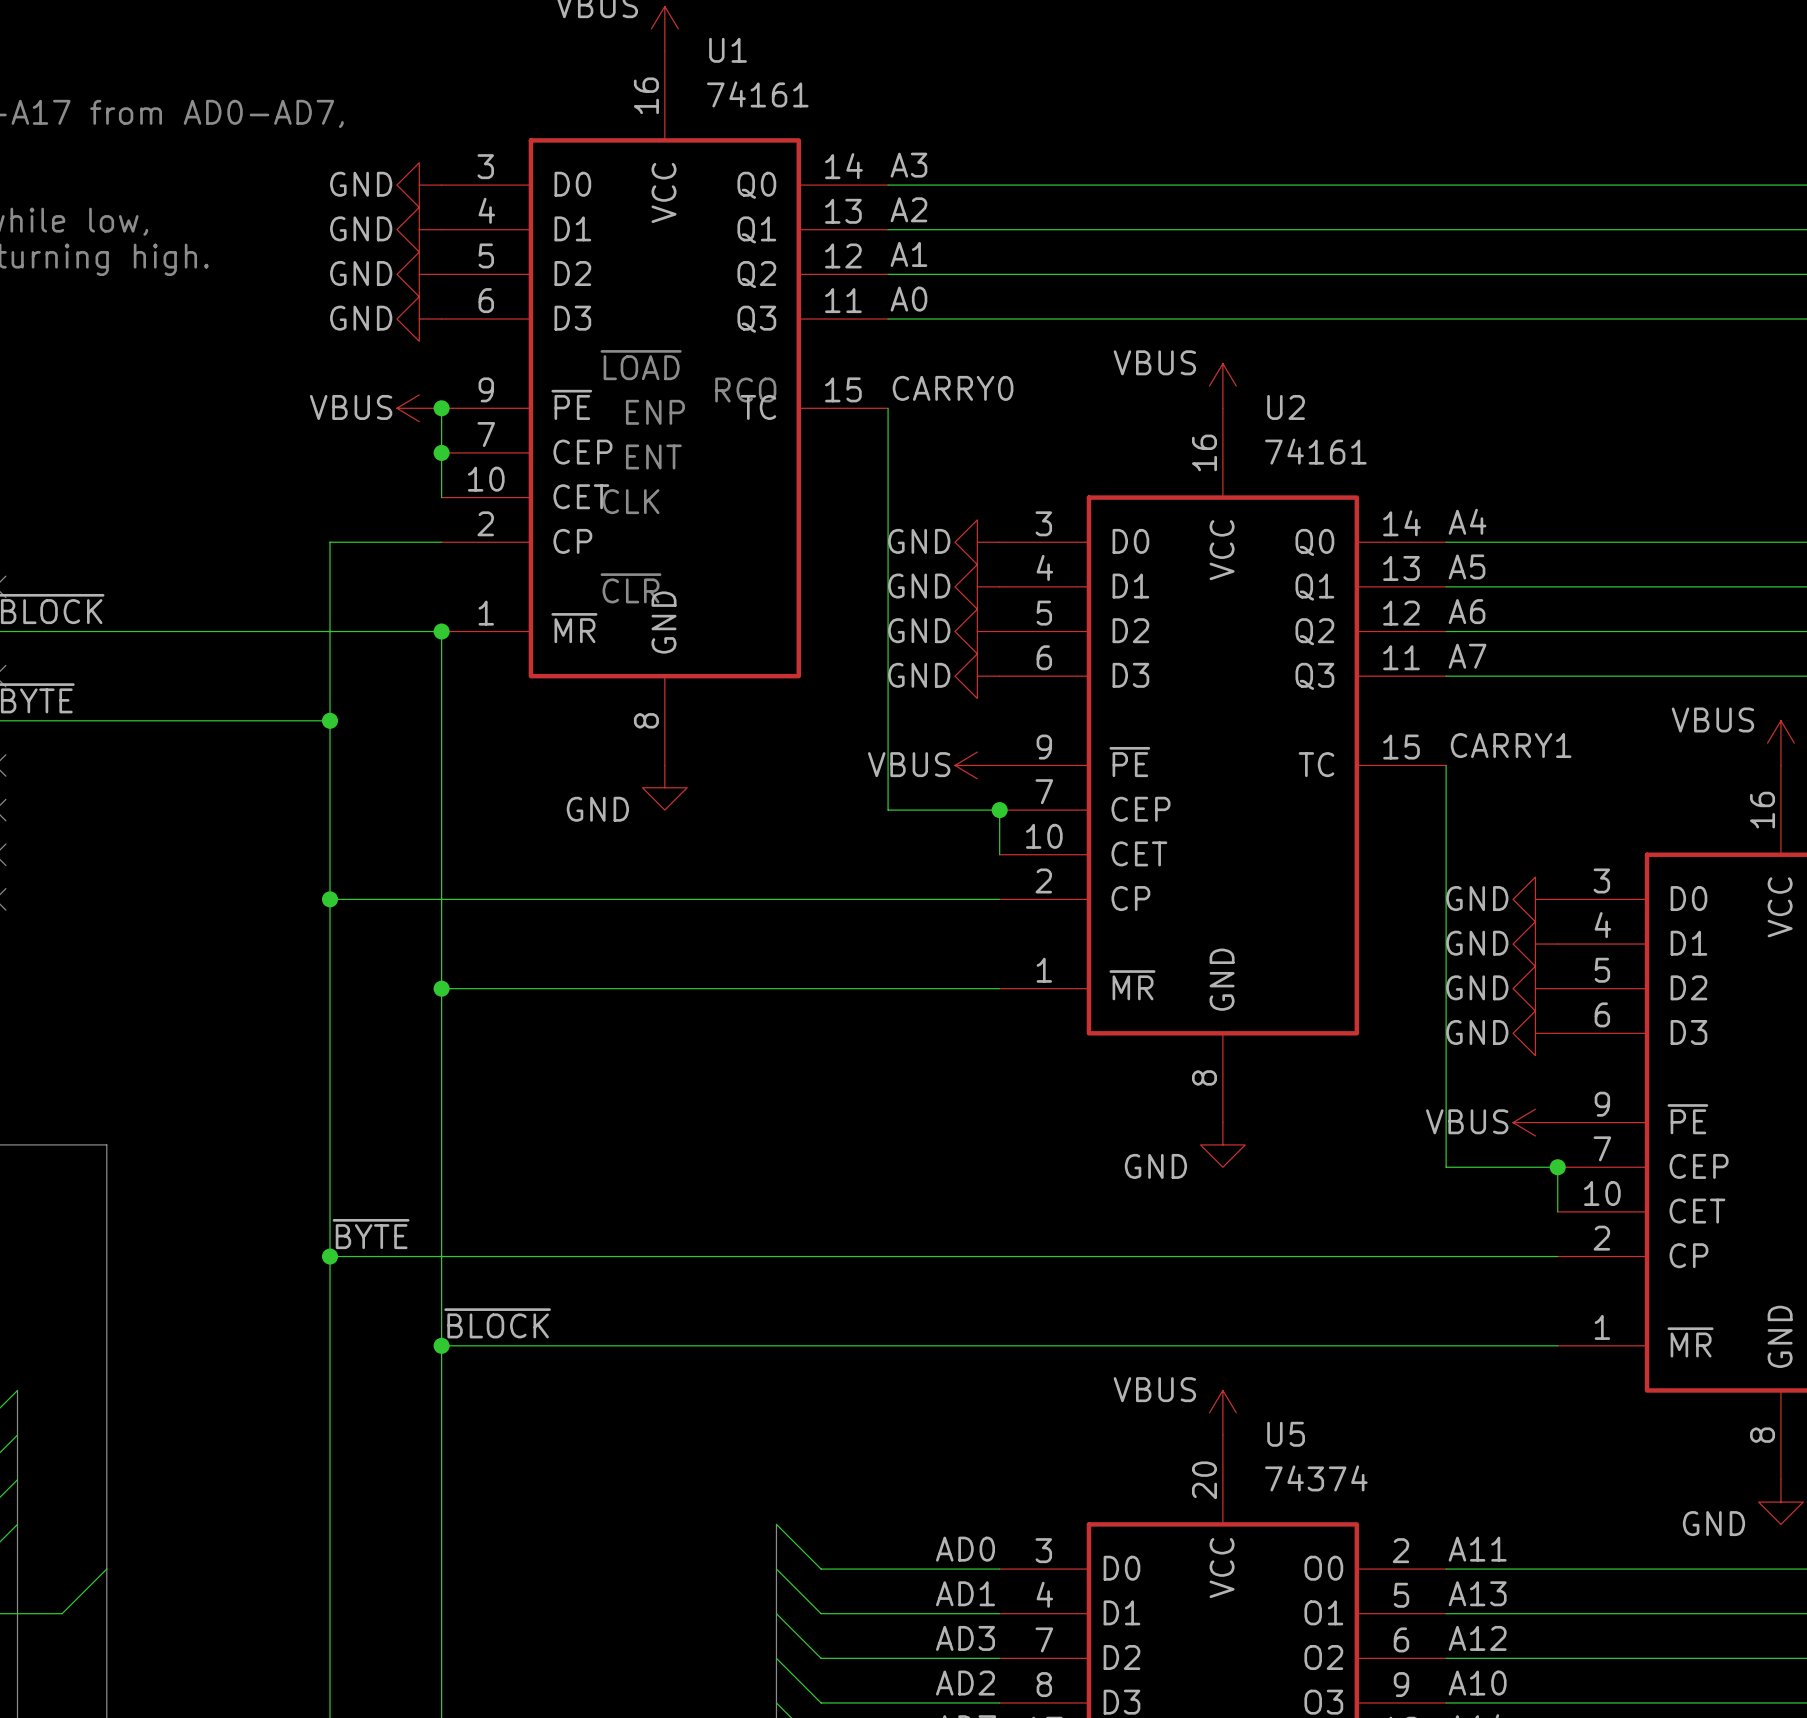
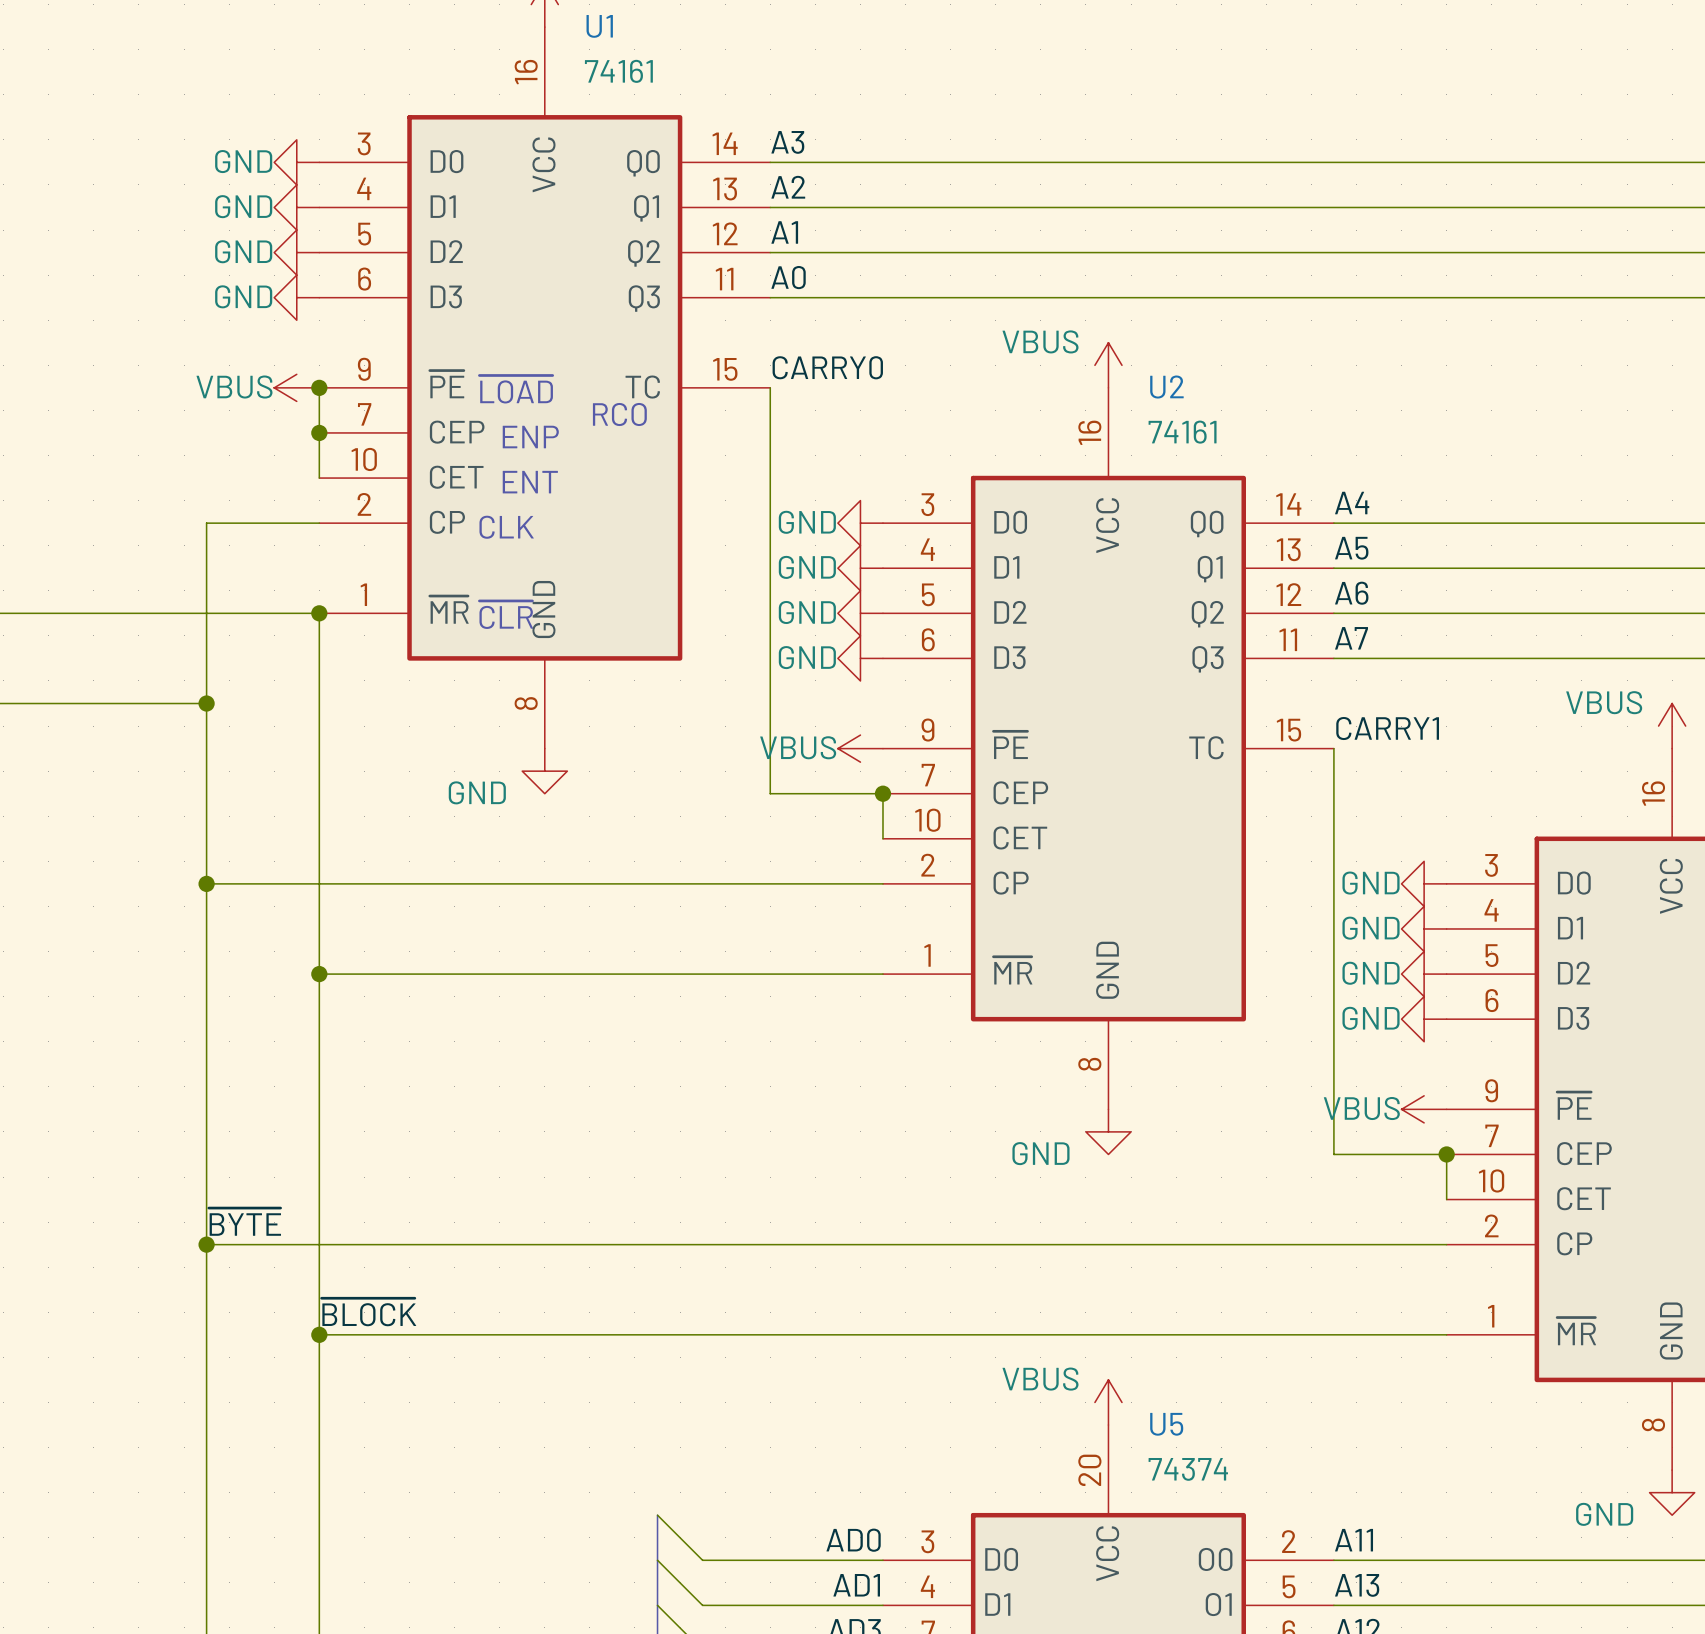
text position: ~{LOAD} (641, 365) -> ~{LOAD} (516, 389)
text position: RCO (745, 390) -> RCO (619, 414)
text: ENP (655, 412) -> none
text: ENT (653, 456) -> ENP (530, 437)
text position: CLK (630, 501) -> CLK (506, 527)
text: none -> ENT (530, 482)
text position: ~{CLR} (630, 588) -> ~{CLR} (506, 614)

